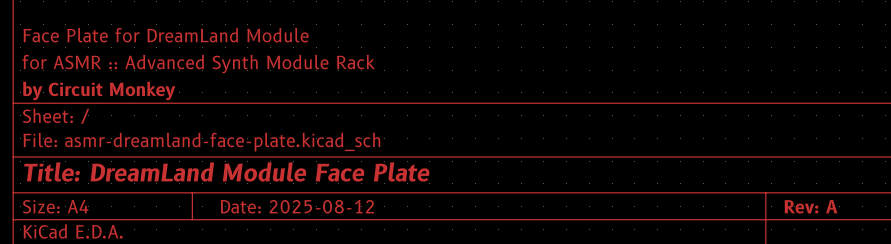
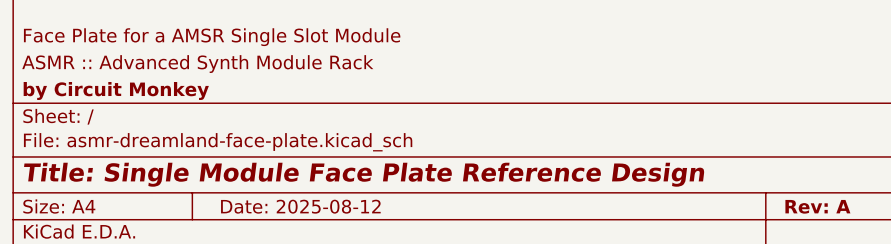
title block: Face Plate for DreamLand Module (166, 35) -> Face Plate for a AMSR Single Slot Module (212, 37)
title block: for ASMR :: Advanced Synth Module Rack (198, 64) -> ASMR :: Advanced Synth Module Rack (197, 64)
title block: Title: DreamLand Module Face Plate (226, 171) -> Title: Single Module Face Plate Reference Design (364, 174)

